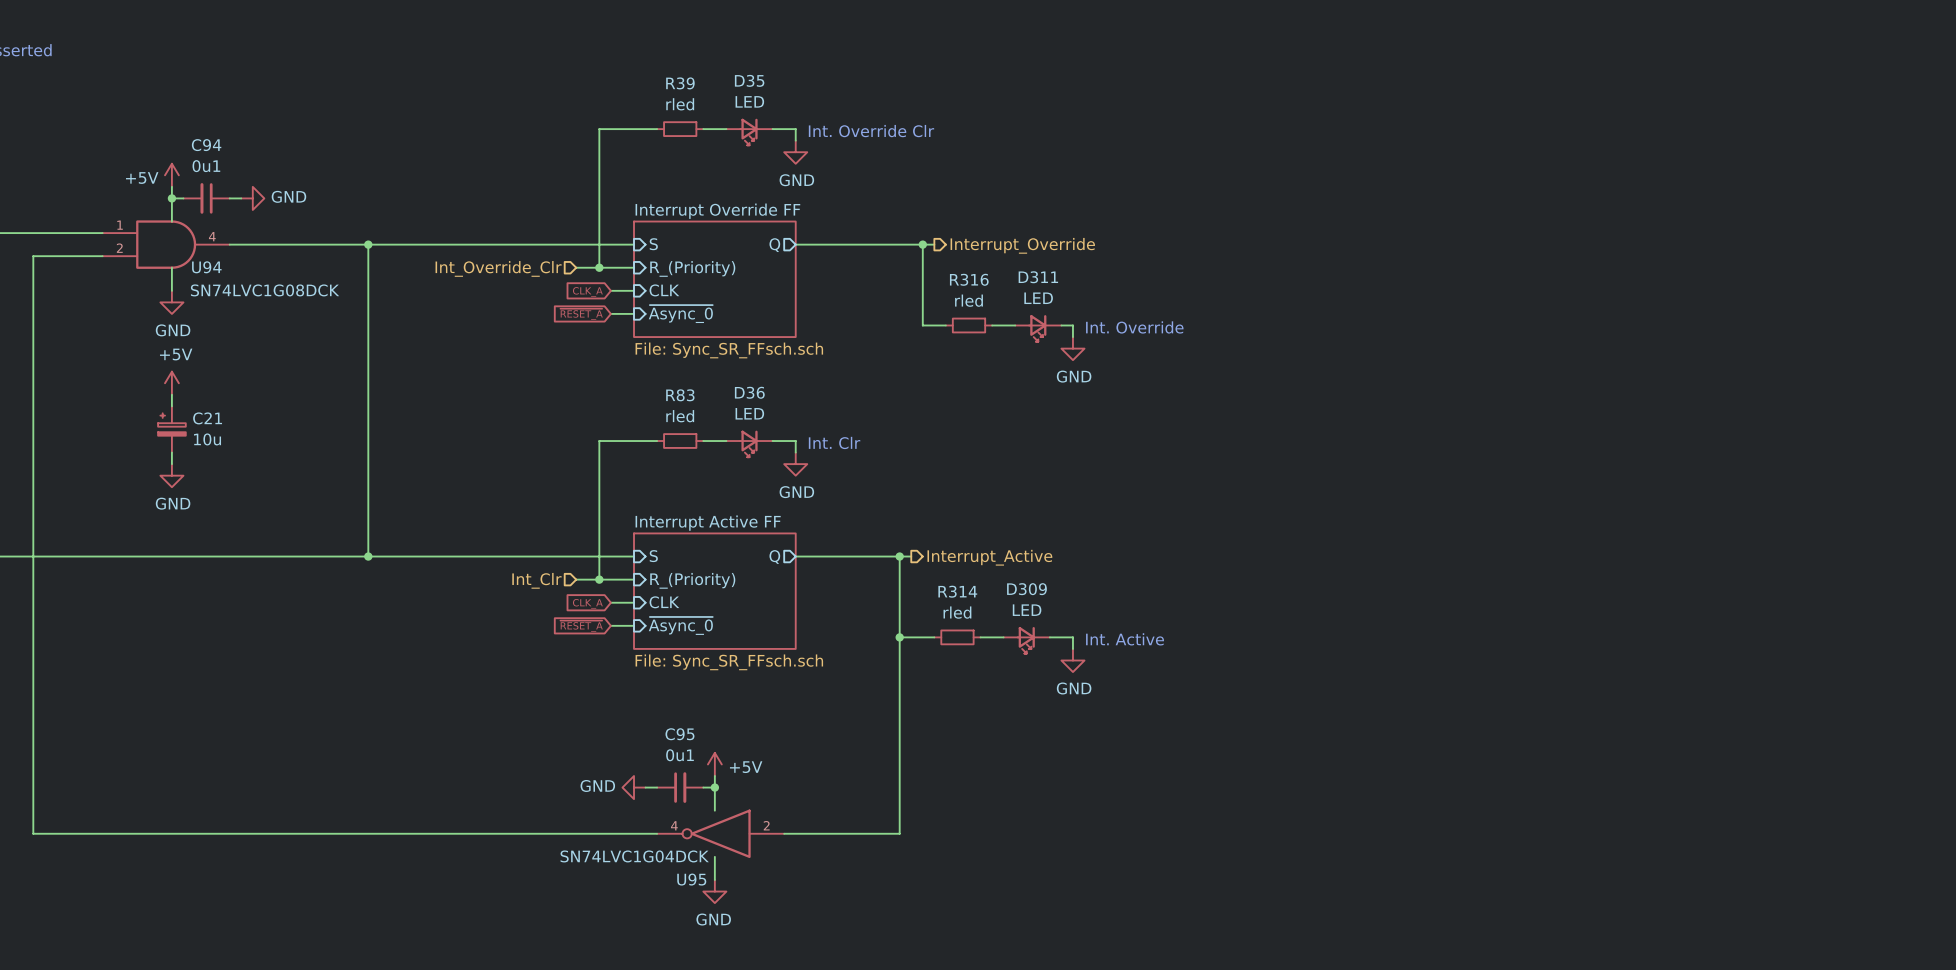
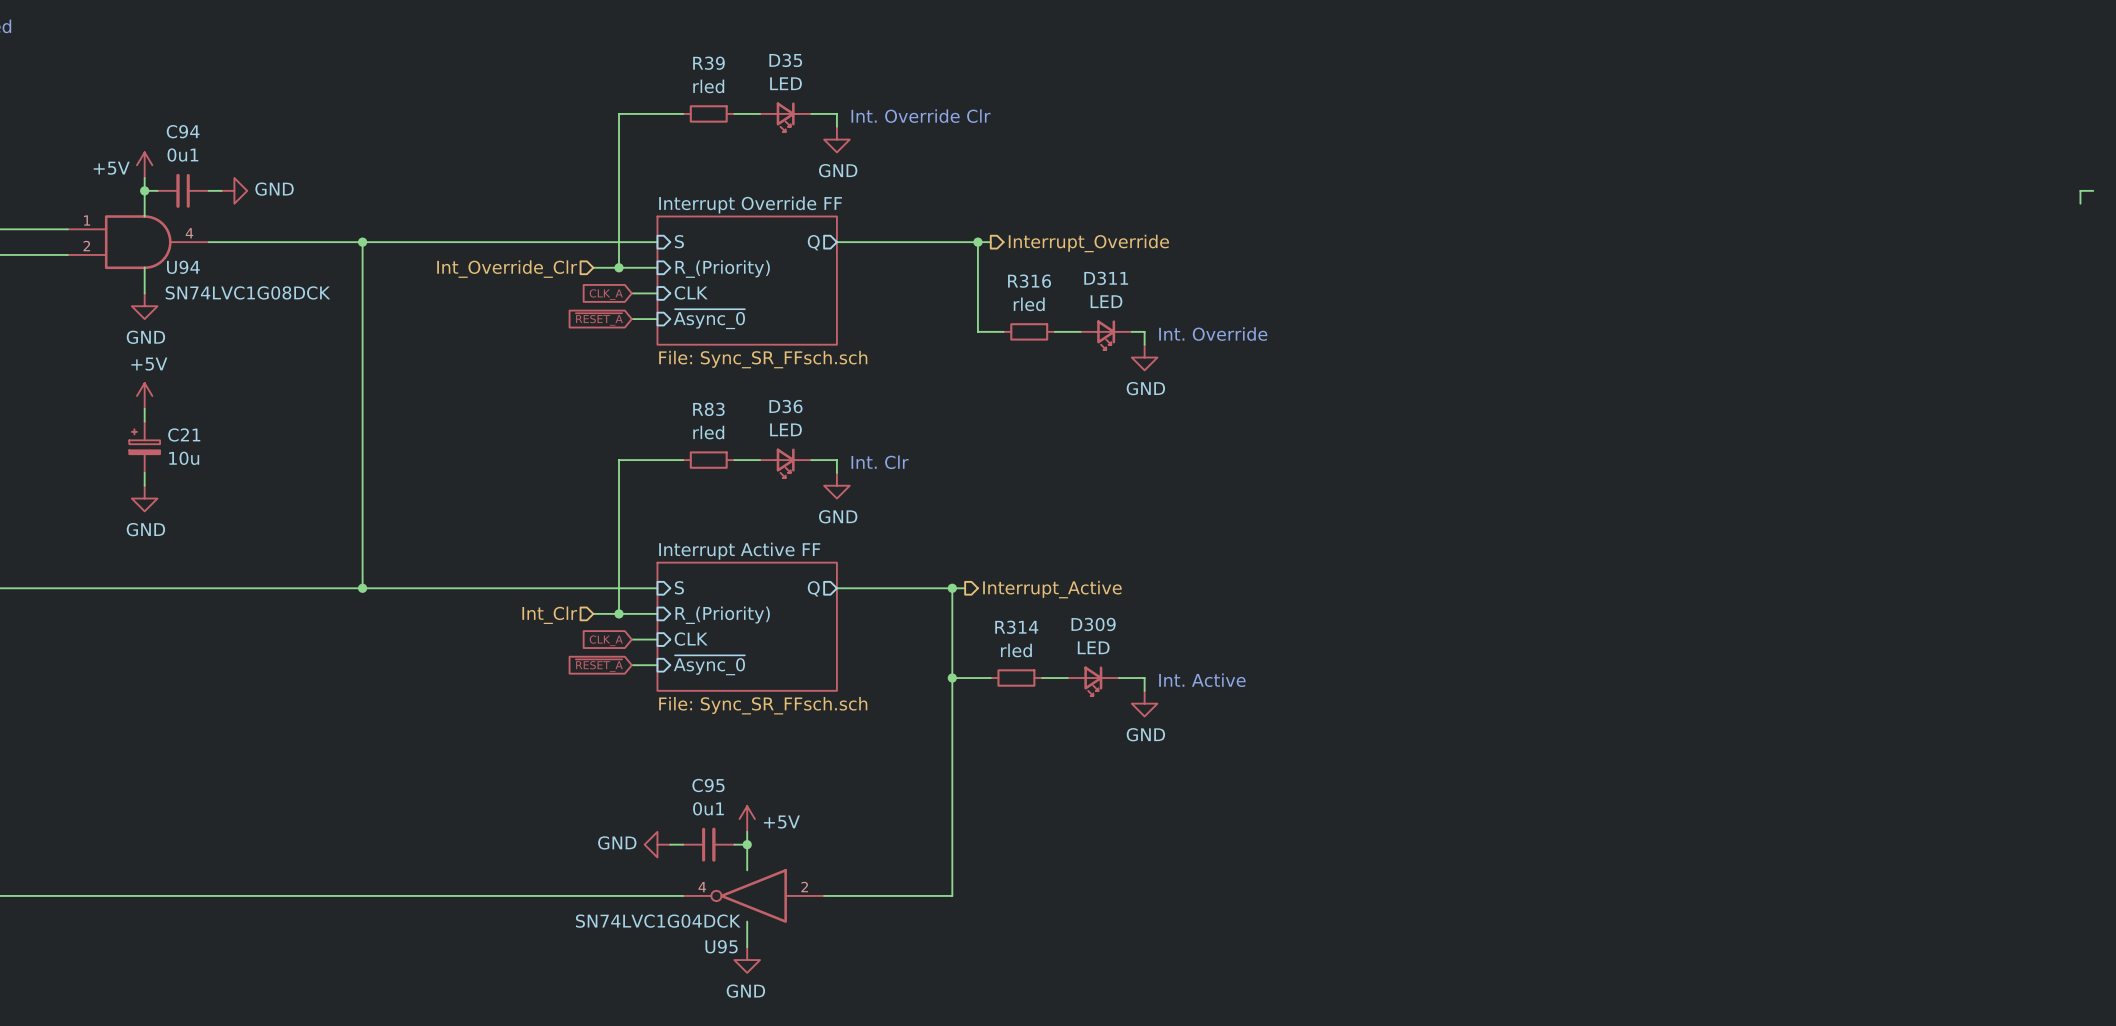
wire: none -> (2093, 190) (2080, 190) (2080, 203)

